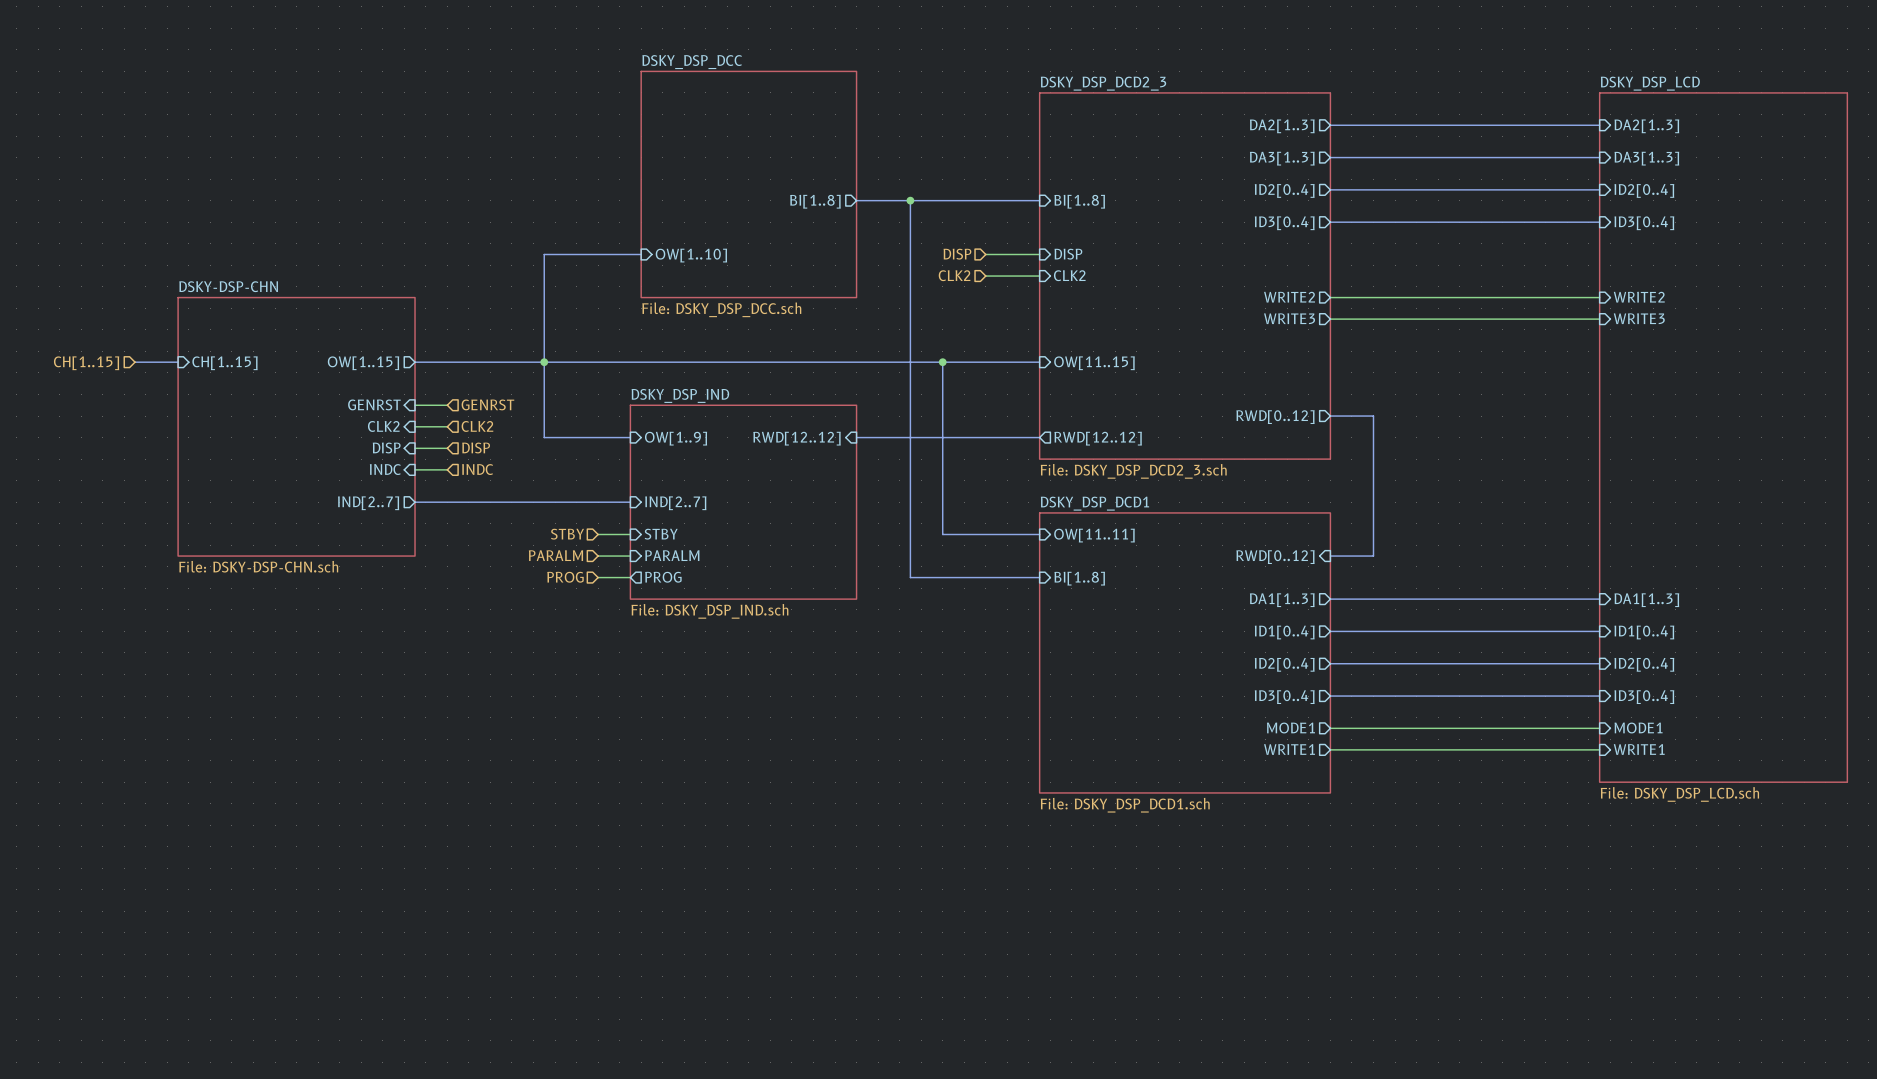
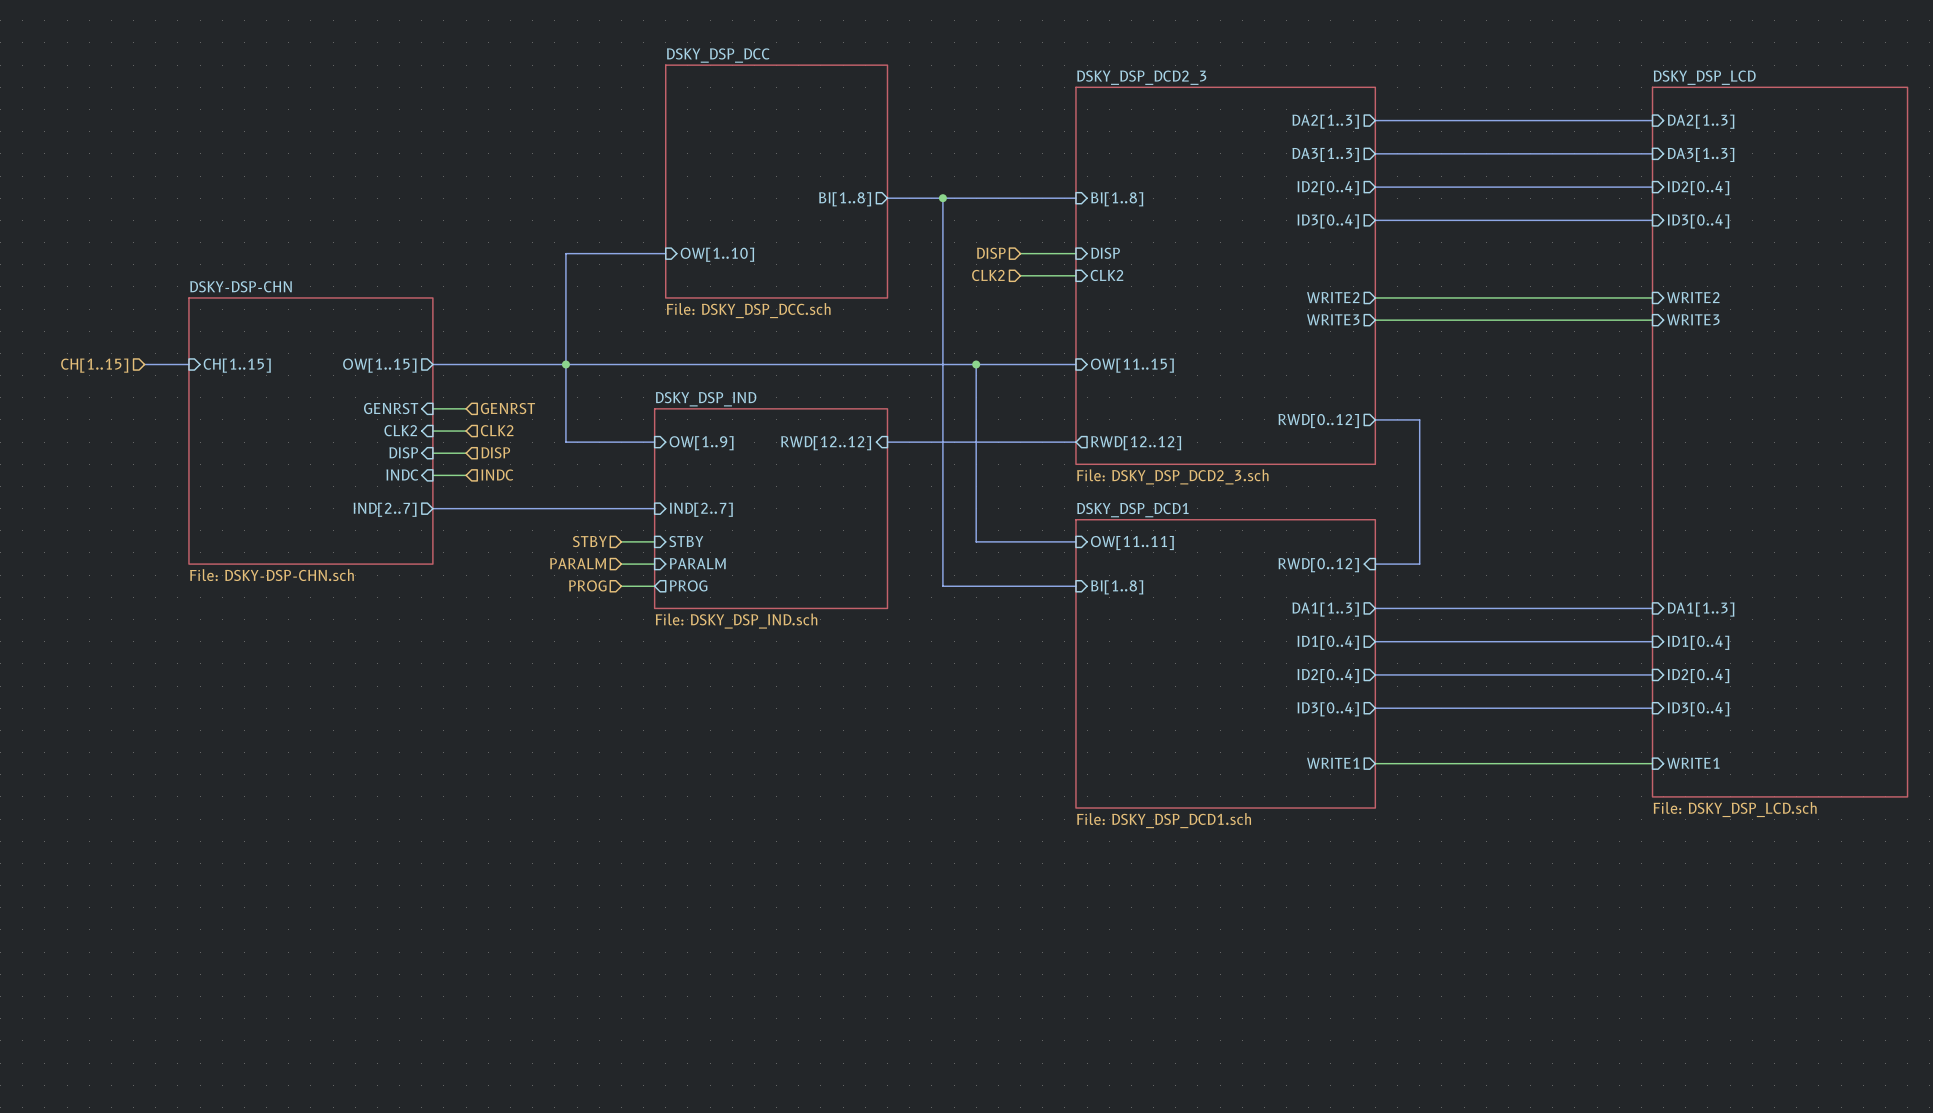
sheet pin: MODE1 (1290, 728) -> none
wire: (1330, 728) (1599, 728) -> none
sheet pin: MODE1 (1638, 728) -> none

